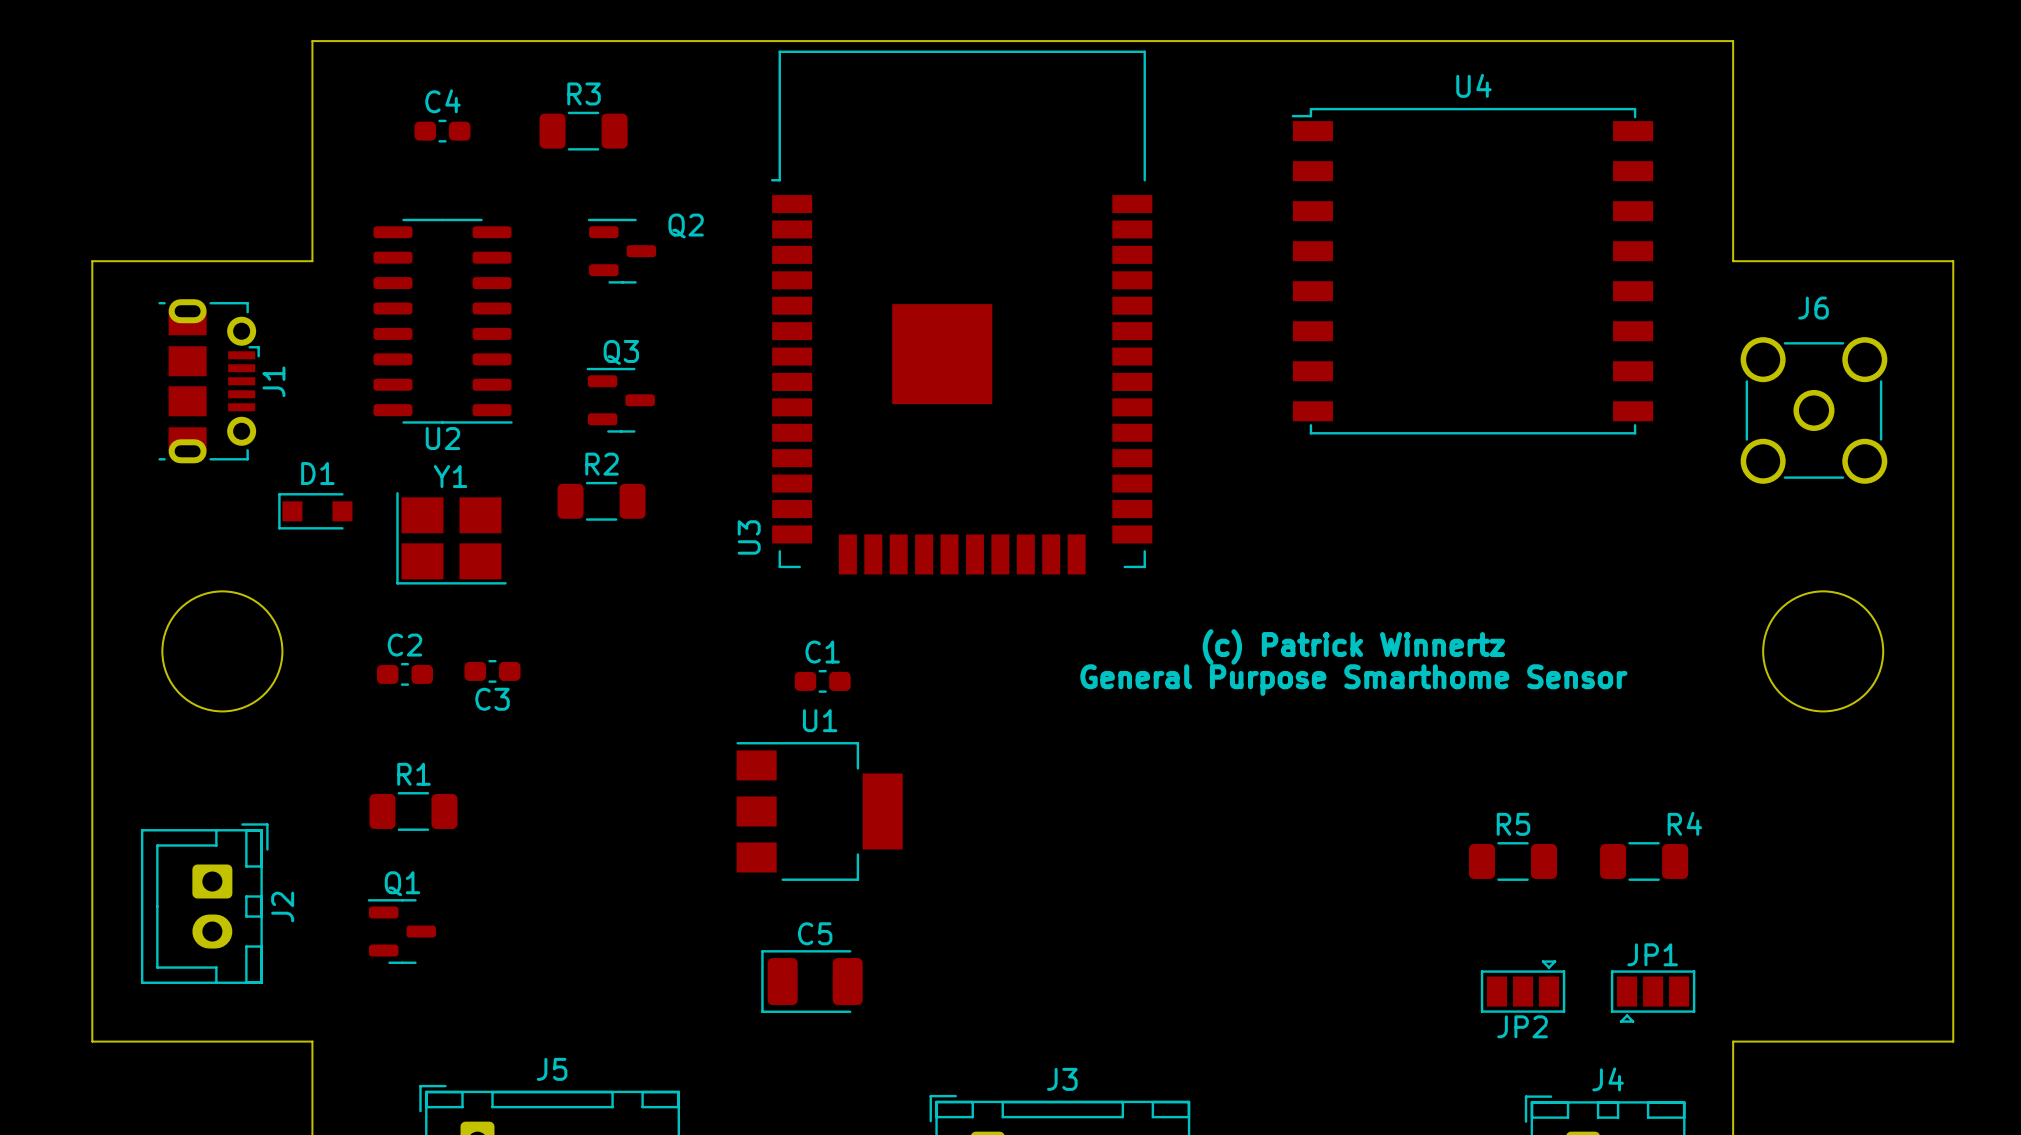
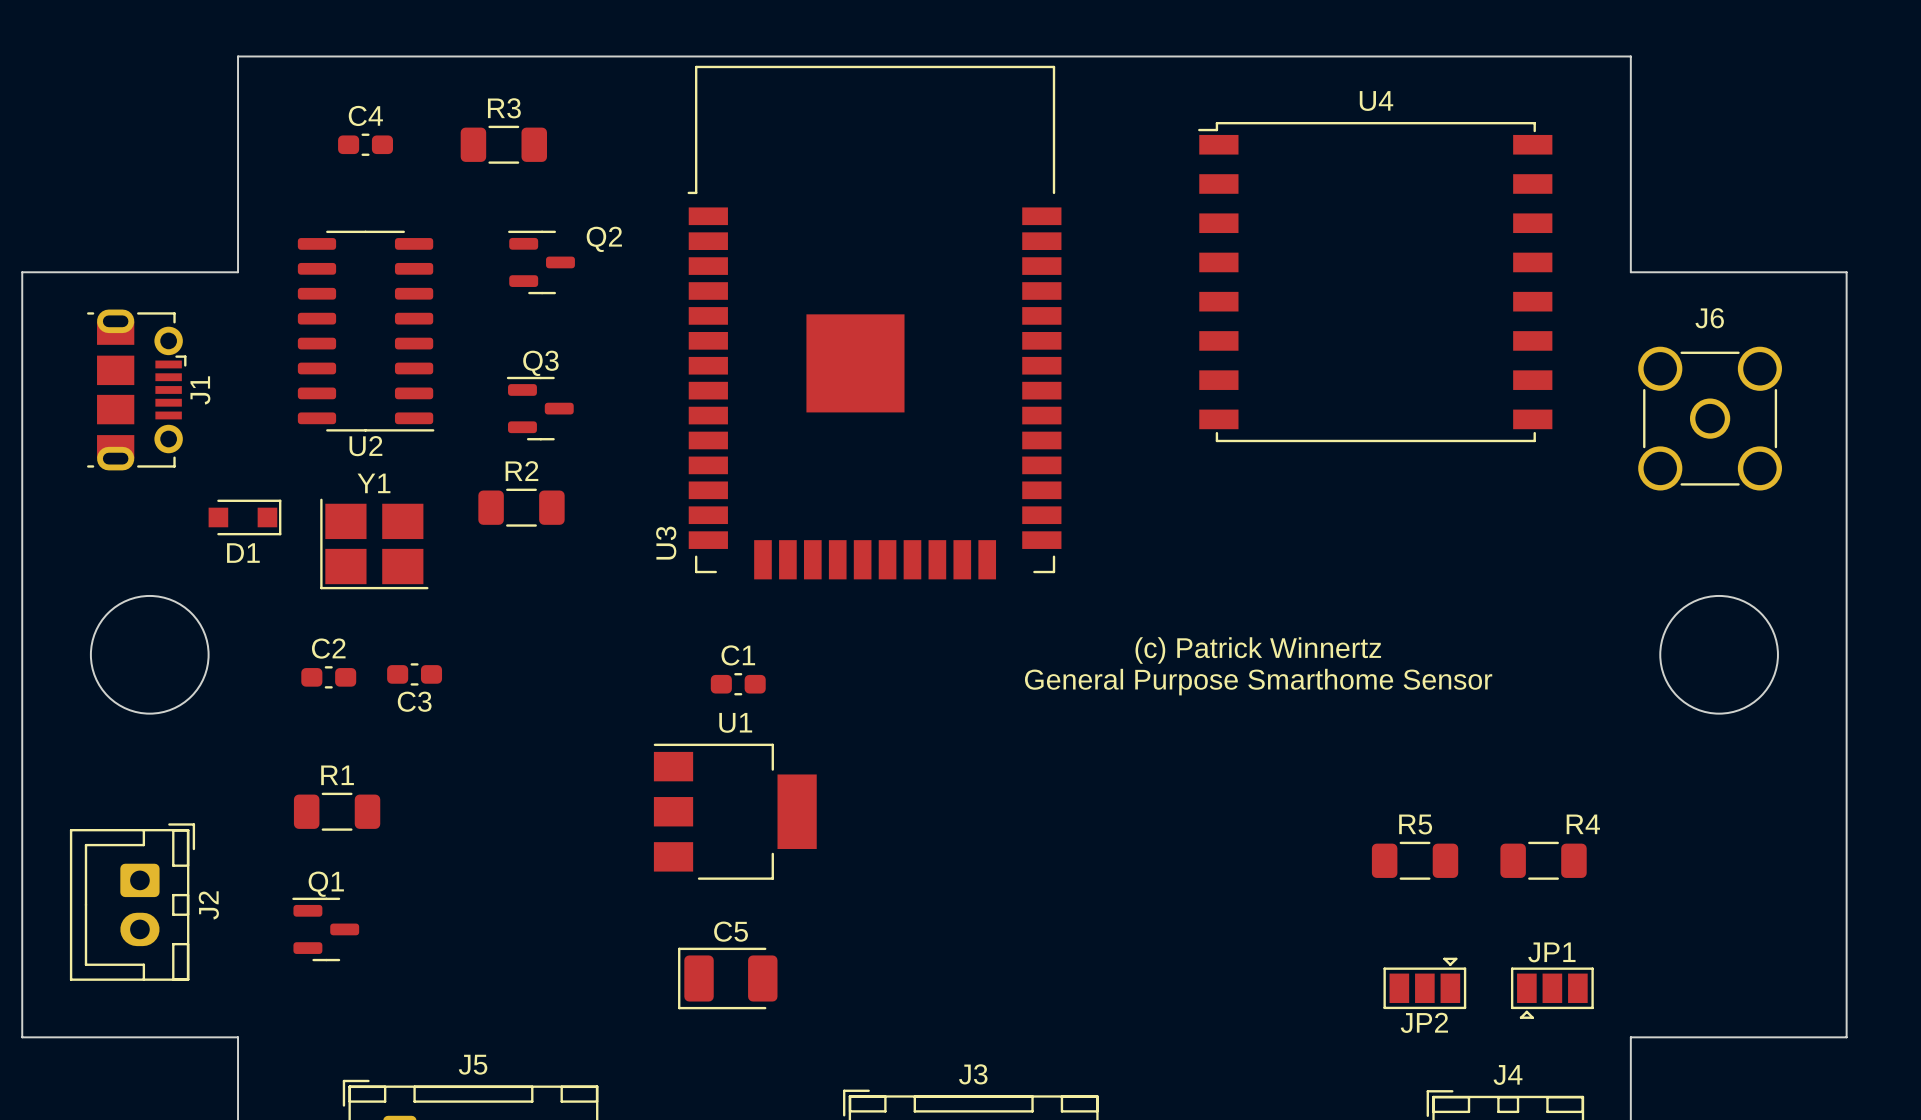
D1 rotation: 0° (315, 511) -> 180° (244, 517)

